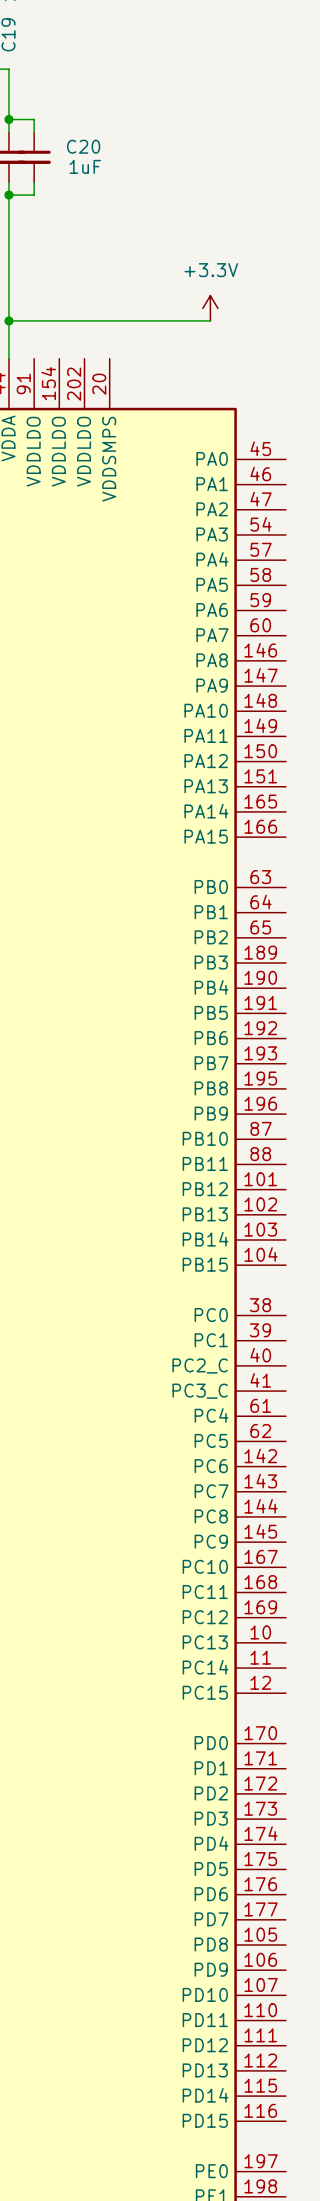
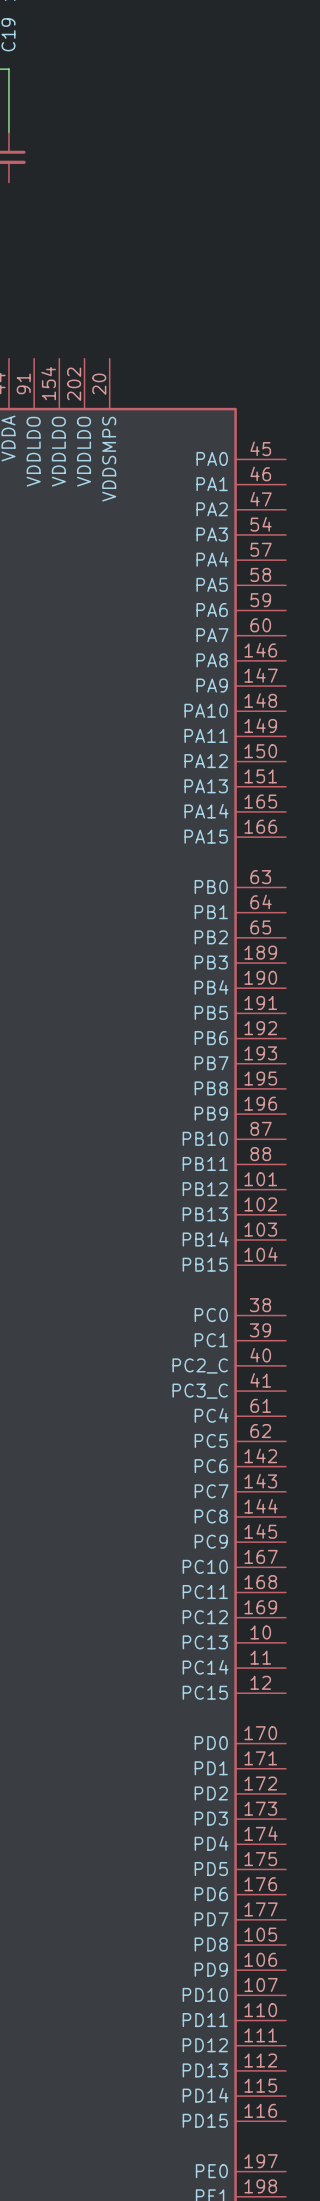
wire: (8, 119) (34, 119) (34, 132) -> none
junction: (8, 119) -> none
C20: 1uF (34, 157) -> none
wire: (8, 182) (8, 358) -> none
wire: (34, 182) (34, 195) (8, 195) -> none
junction: (8, 195) -> none
power symbol: +3.3V (210, 308) -> none
wire: (8, 320) (210, 320) -> none
junction: (8, 320) -> none

